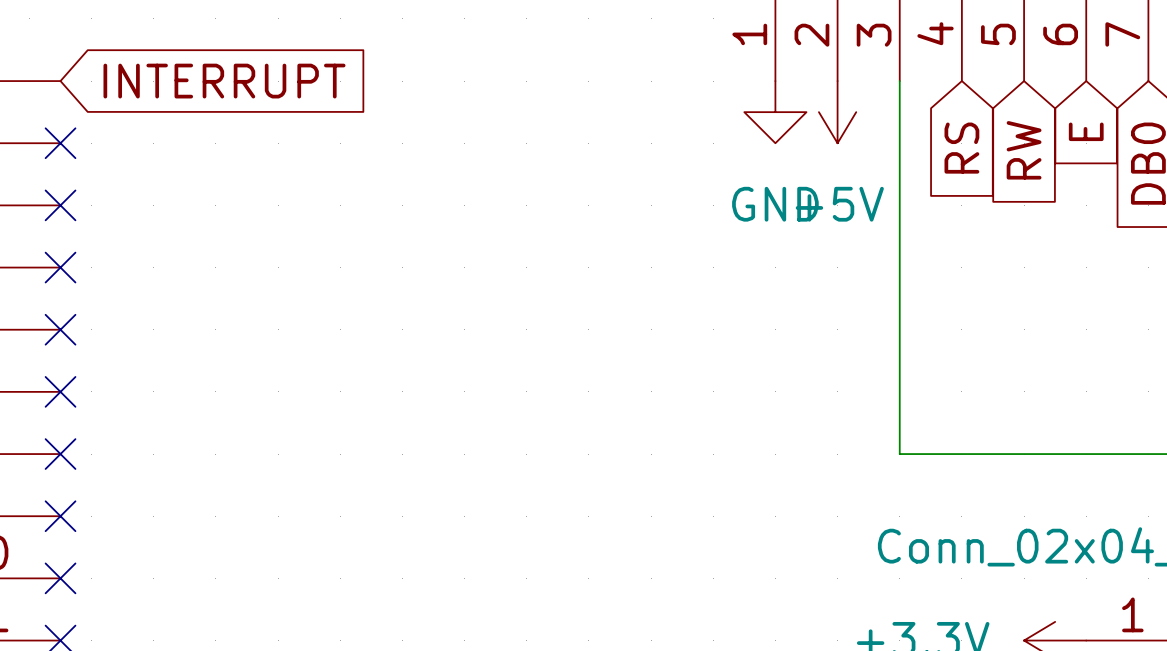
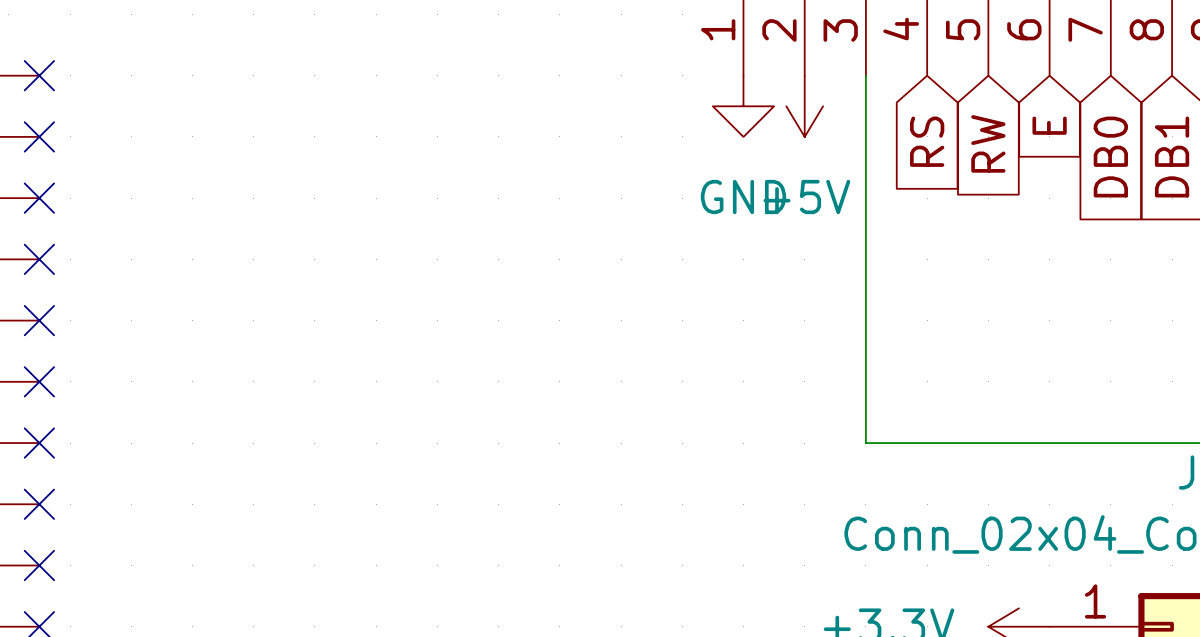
no-connect mark: none -> (39, 75)
global label: INTERRUPT (224, 81) -> none

